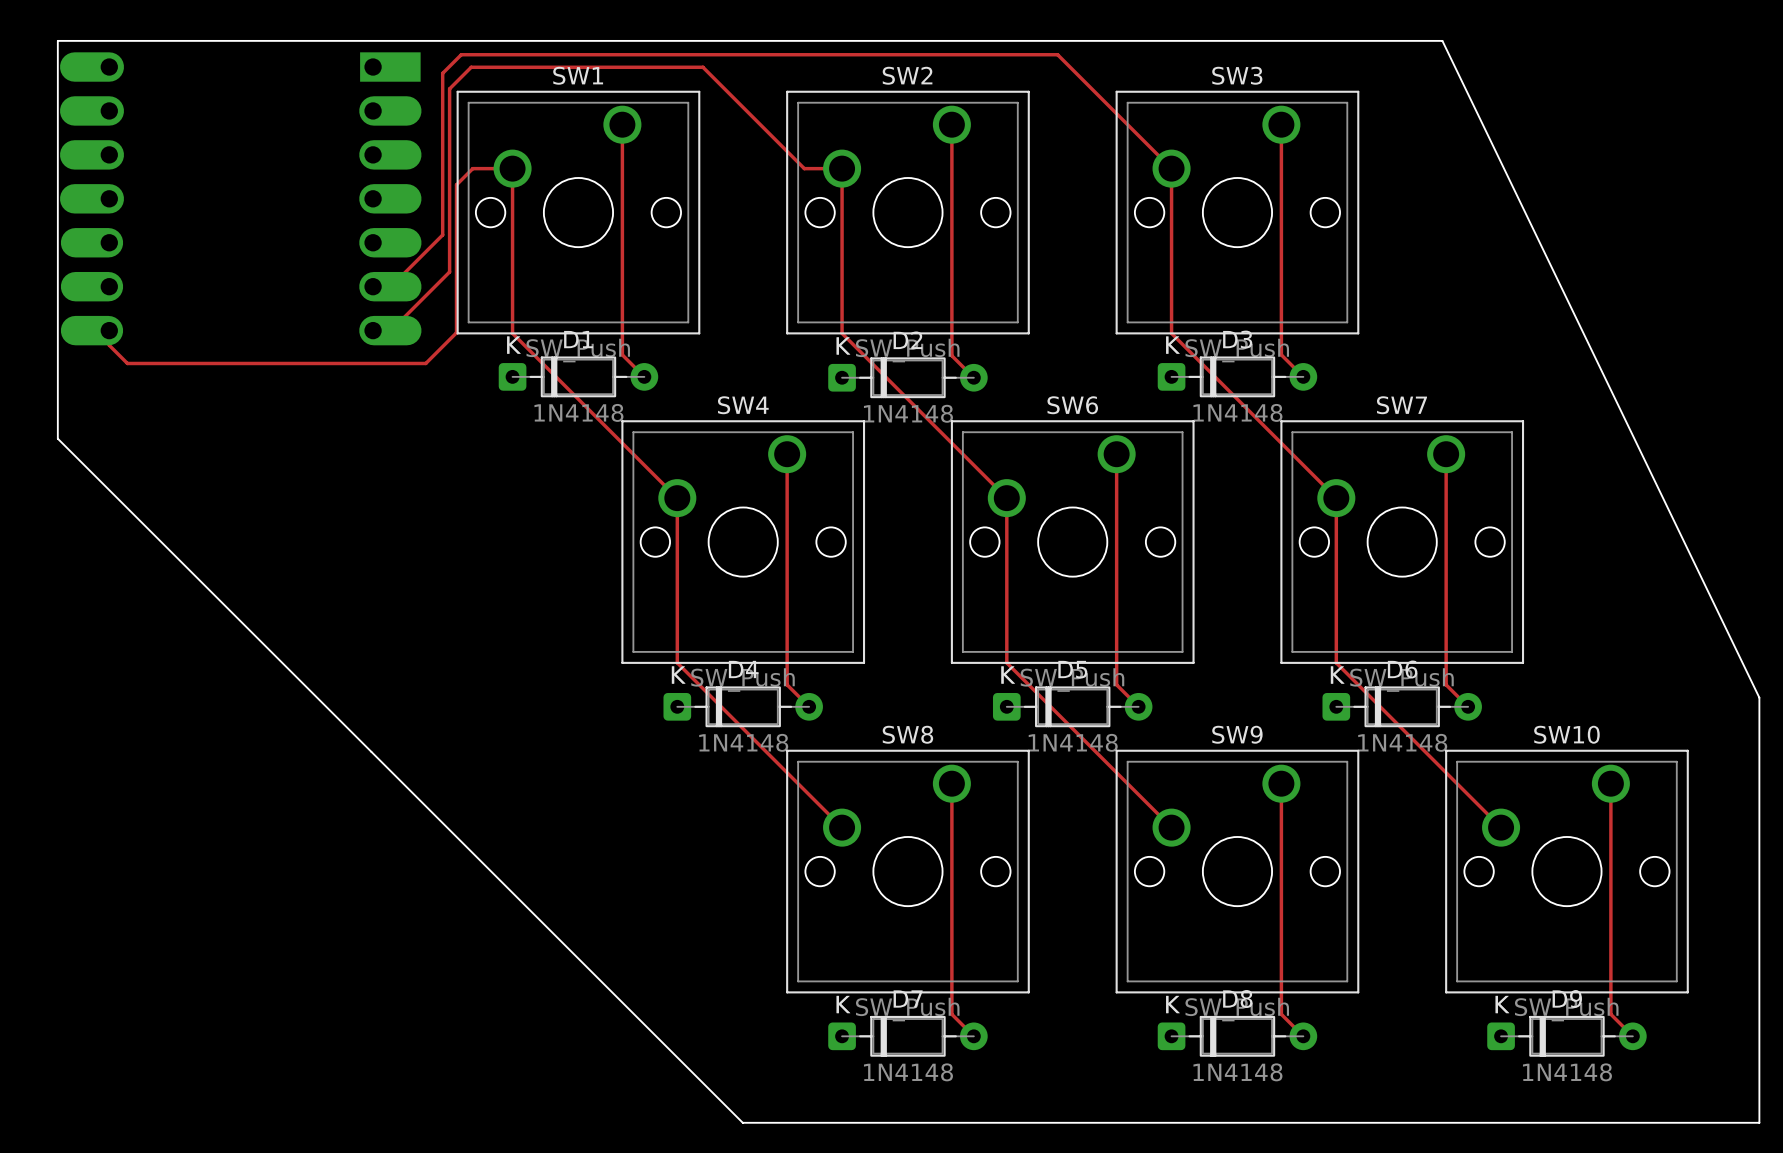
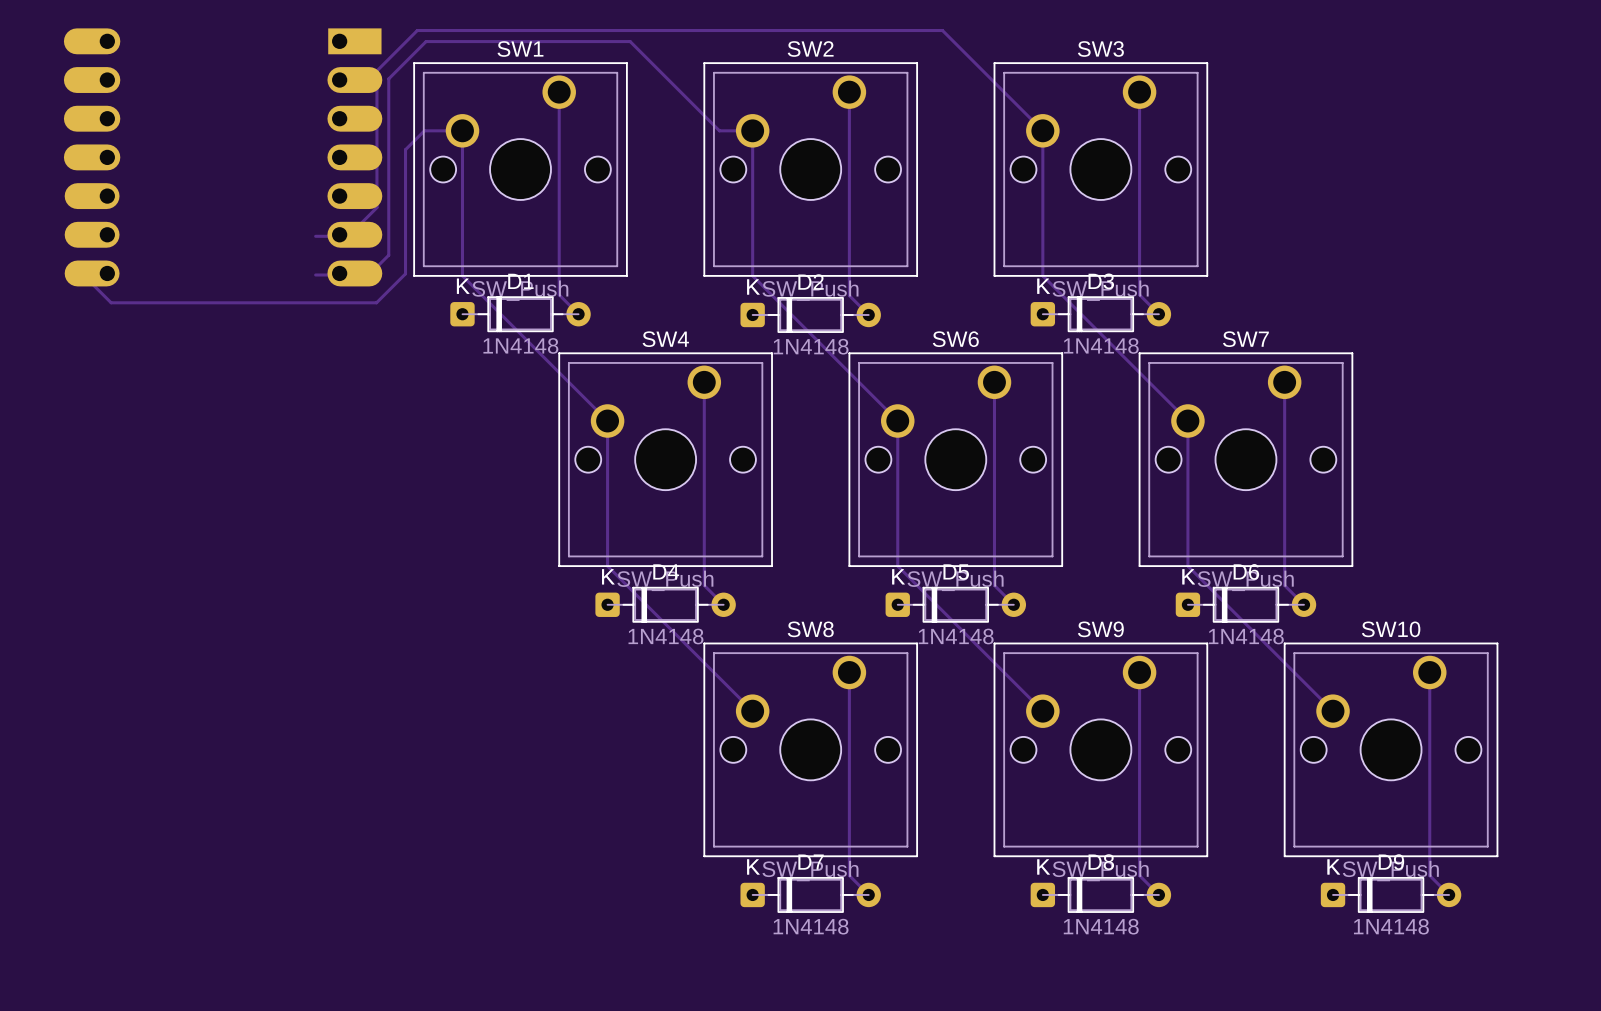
board edge: (57, 40) (1442, 40) (1759, 697) (1759, 1122) (742, 1122) (57, 438) (57, 40) -> none
track: (442, 73) (442, 234) (390, 286) (373, 286) -> (400, 46) (376, 70) (376, 207) (348, 236) (315, 236)
track: (449, 88) (449, 272) (390, 330) (373, 330) -> (407, 60) (388, 78) (388, 255) (368, 275) (315, 275)
track: (472, 168) (456, 184) (456, 332) (425, 363) (127, 363) (109, 345) (109, 330) -> (427, 130) (424, 130) (405, 149) (405, 273) (376, 302) (111, 302) (83, 275)

